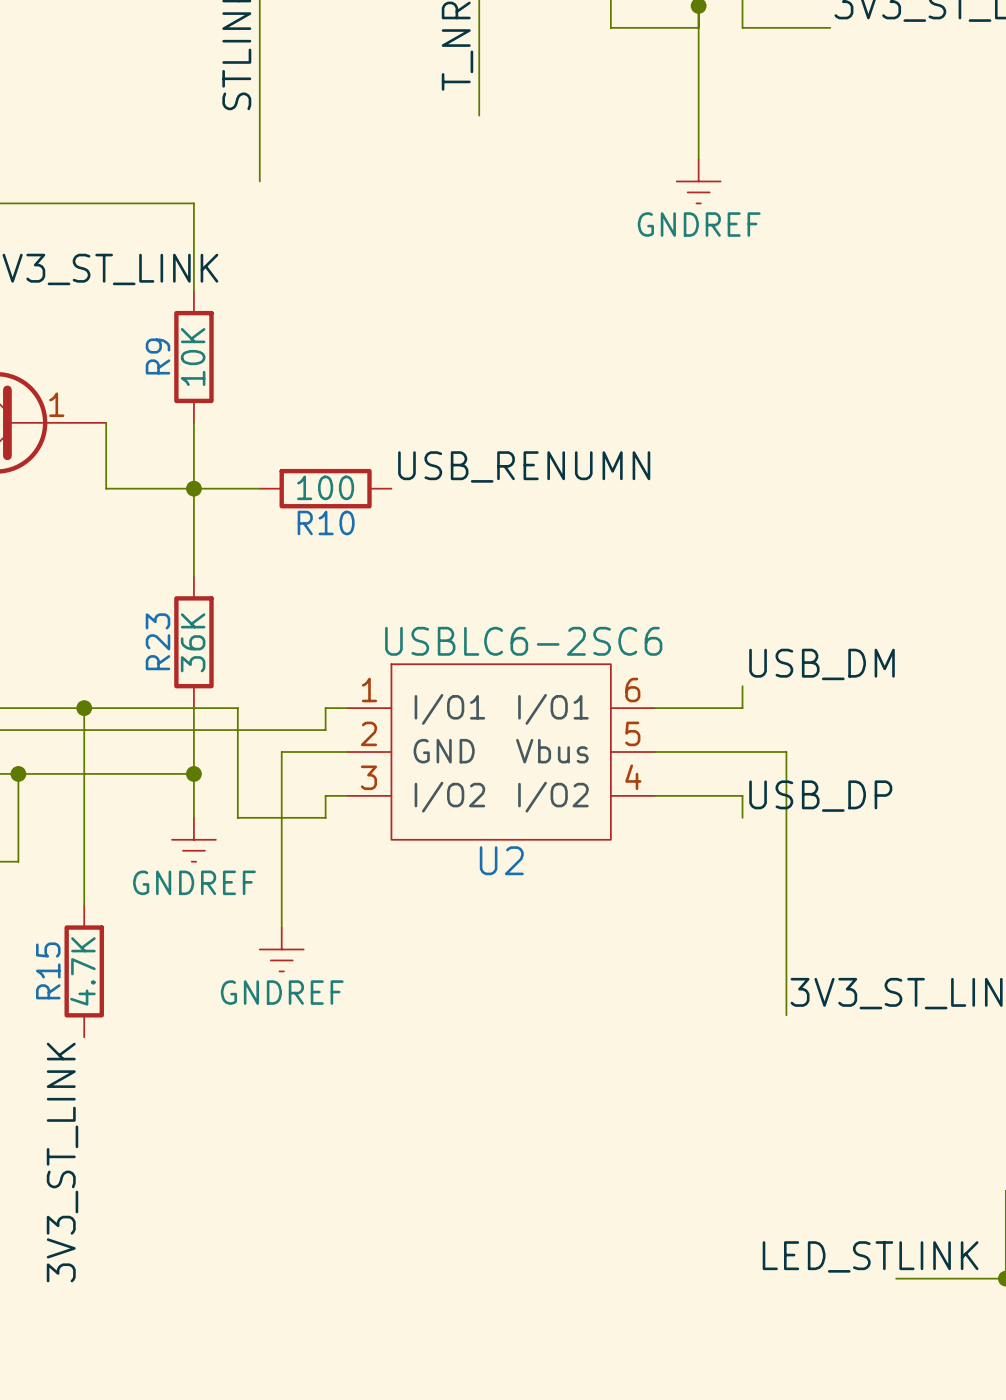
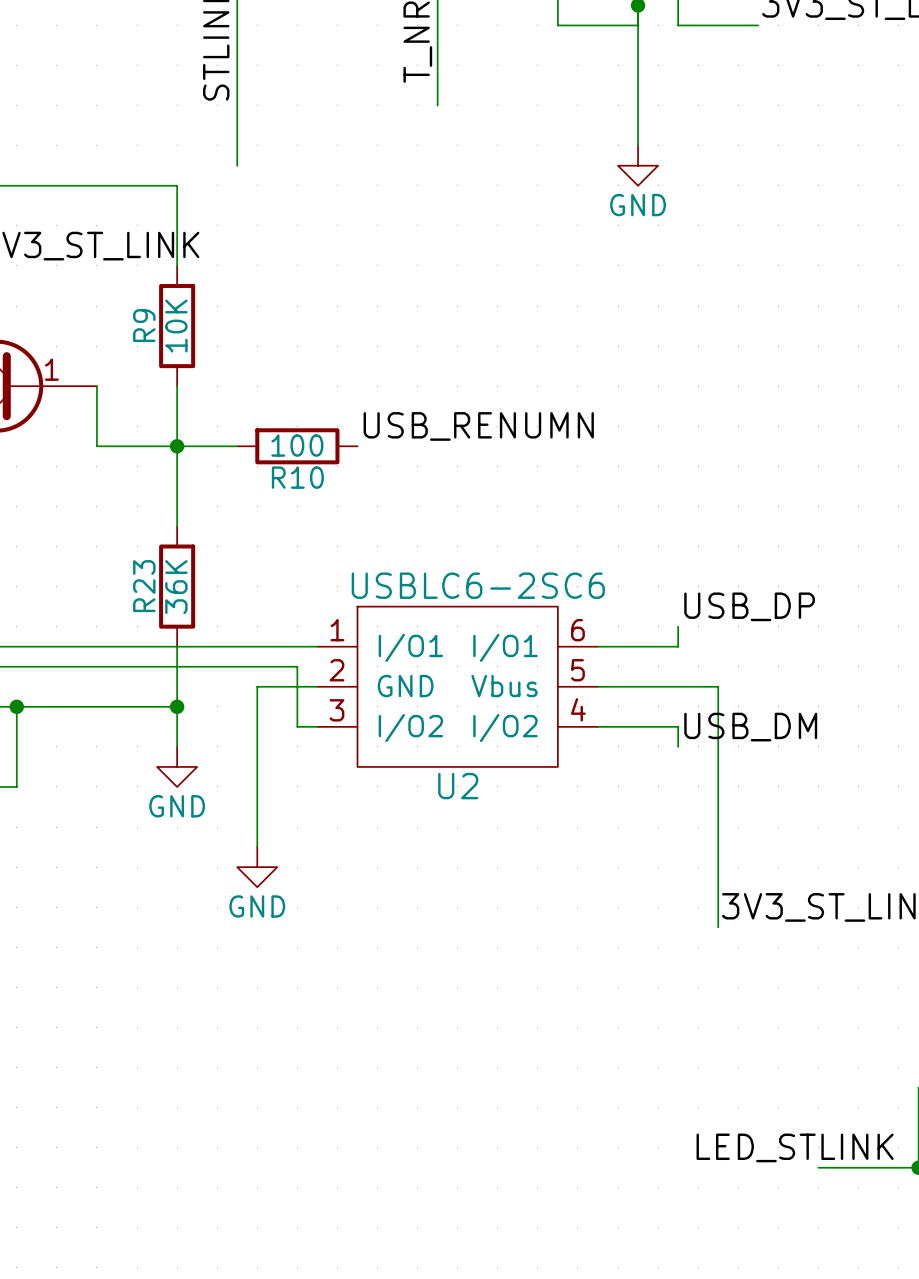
power symbol: GNDREF (698, 181) -> GND (638, 165)
label: USB_DM (822, 664) -> USB_DP (749, 606)
wire: (84, 708) (84, 905) -> none
junction: (84, 708) -> none
wire: (237, 708) (237, 817) (325, 817) (325, 795) -> (217, 646) (297, 646)
wire: (325, 708) (325, 730) -> (297, 726) (297, 666)
label: USB_DP (820, 796) -> USB_DM (750, 727)
power symbol: GNDREF (193, 839) -> GND (177, 766)
power symbol: GNDREF (281, 949) -> GND (257, 867)
R15: 4.7K (84, 971) -> none
label: 3V3_ST_LINK (62, 1162) -> none

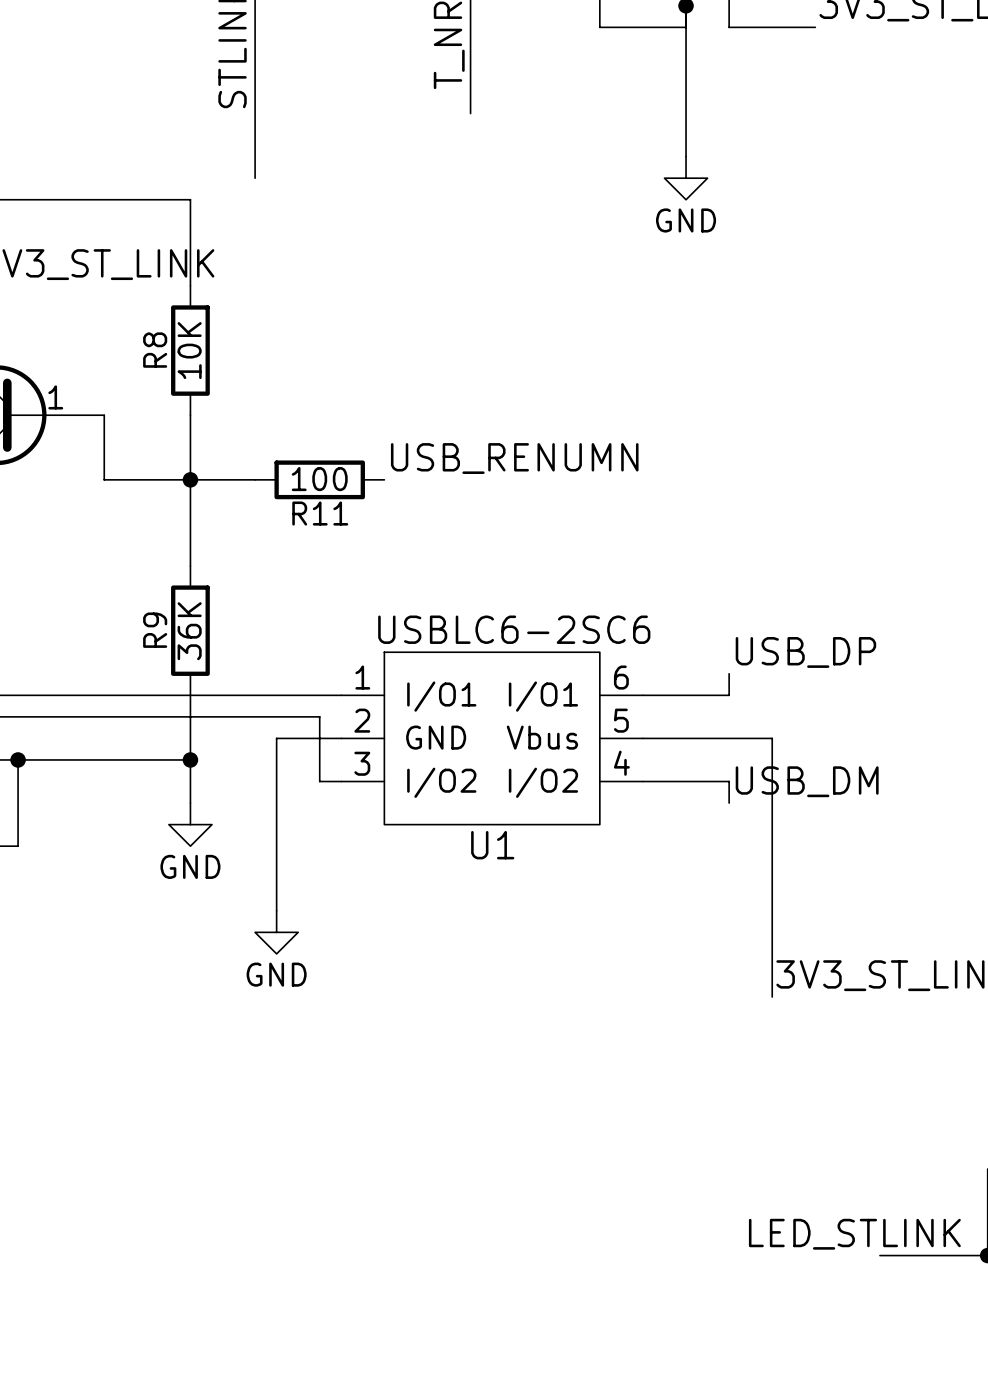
R9 name: R9 (144, 325) -> R8 (155, 350)
R10 name: R10 (297, 477) -> R11 (320, 513)
R23 name: R23 (144, 586) -> R9 (155, 630)
U2 name: U2 (458, 786) -> U1 (492, 845)

